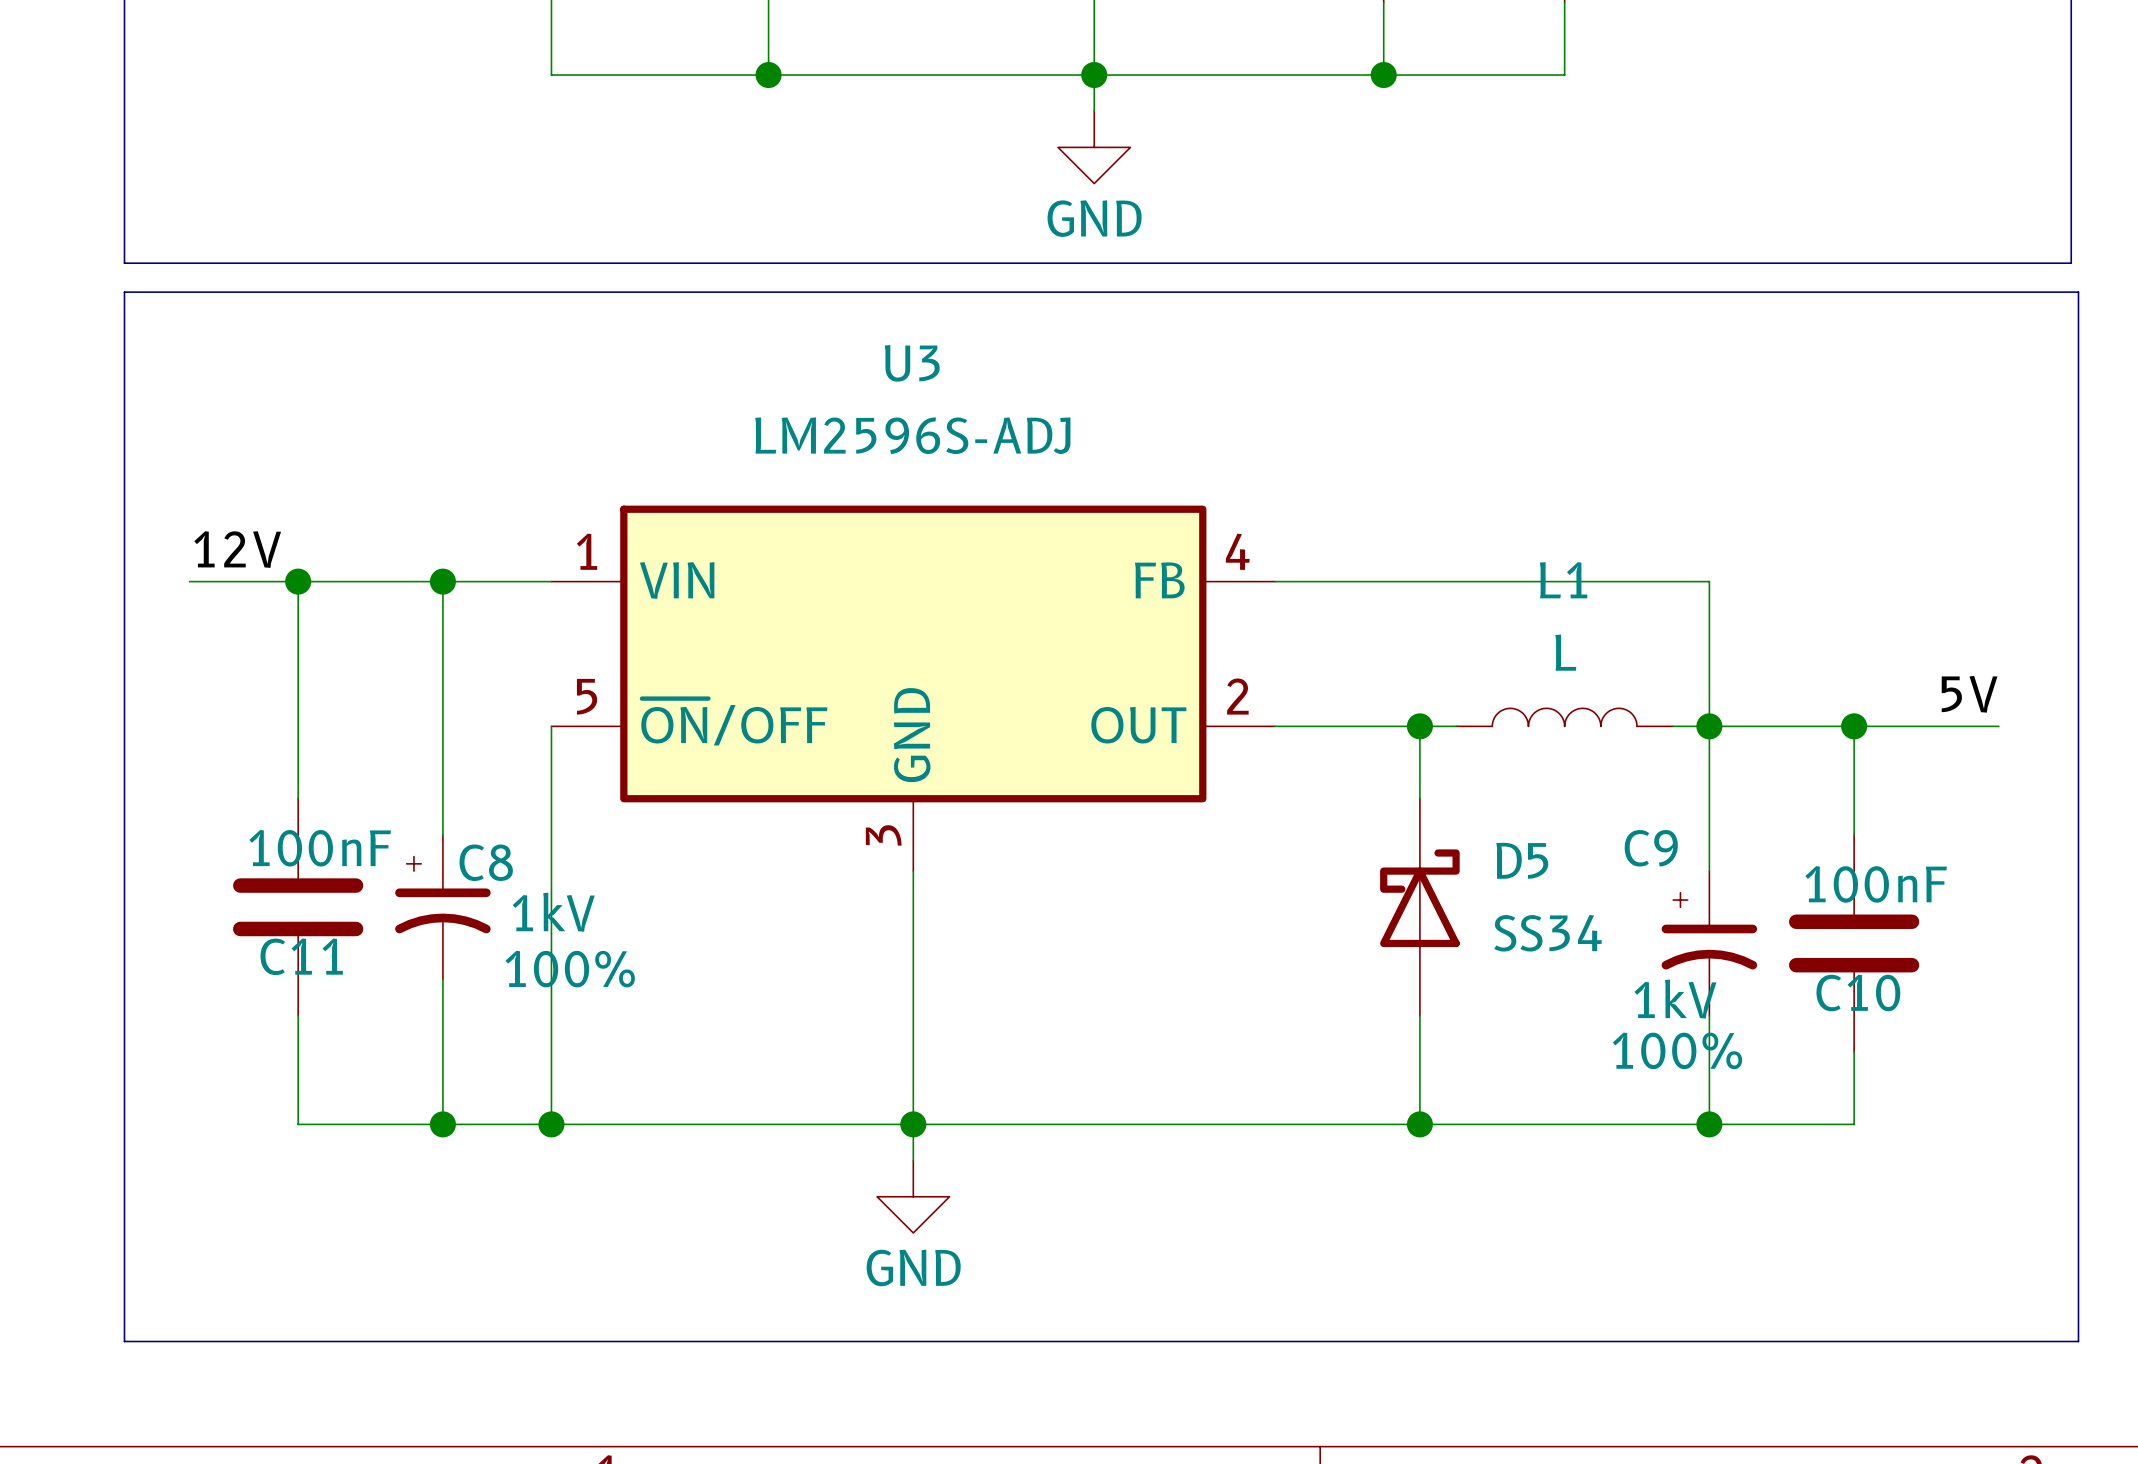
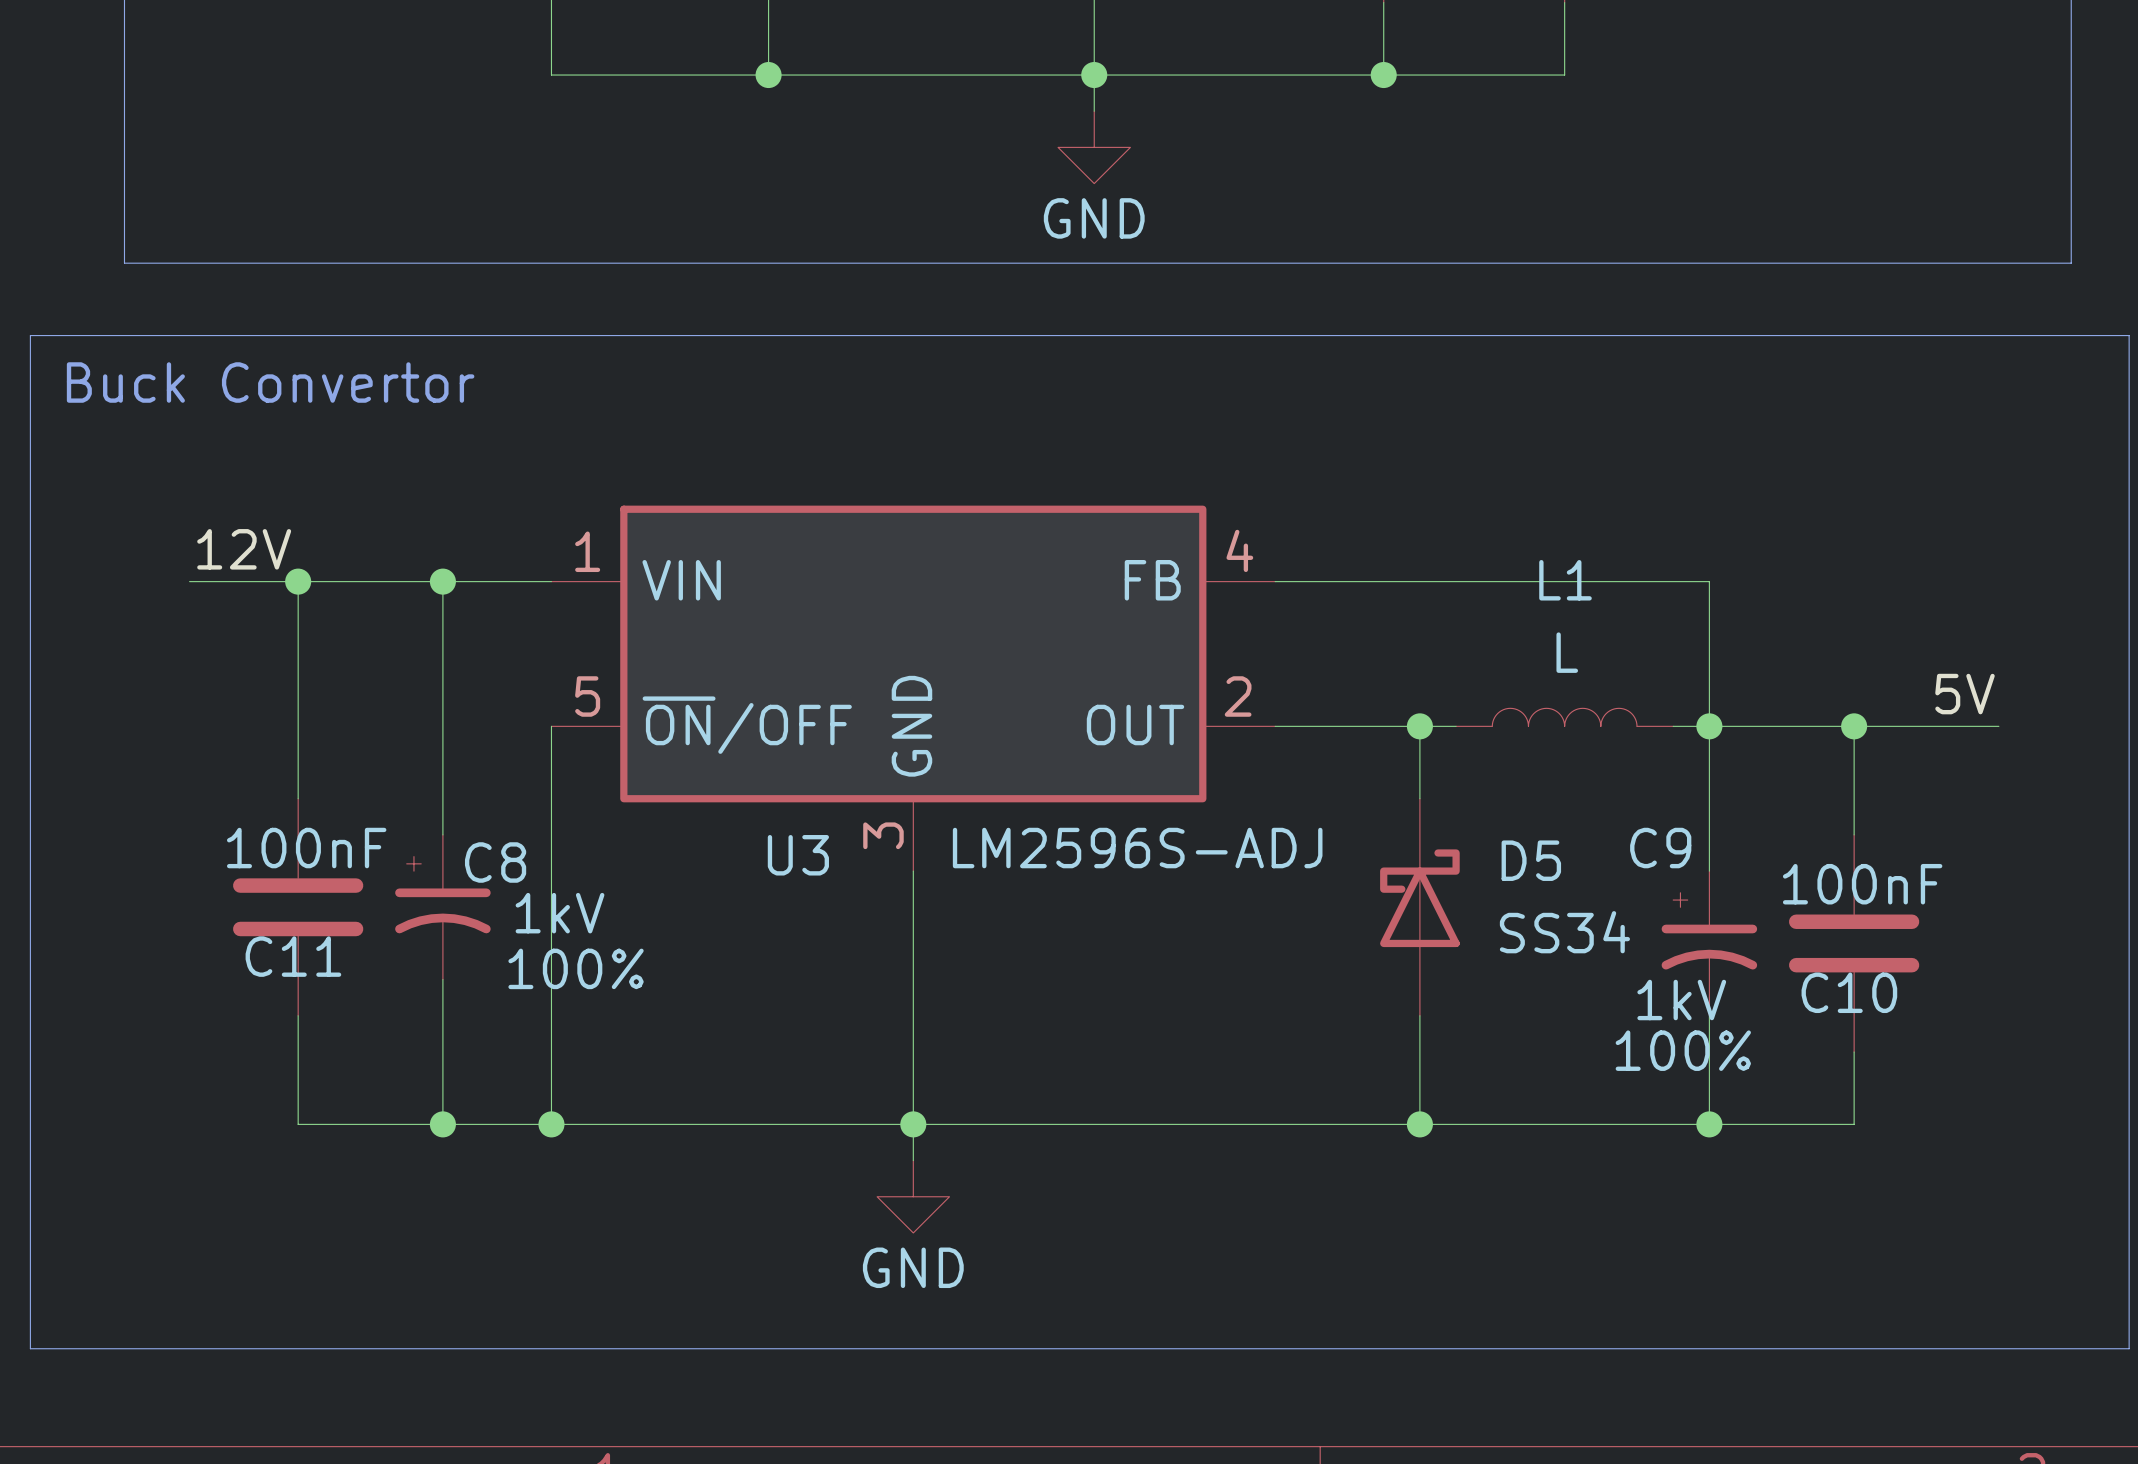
line: (124, 292) (124, 1341) (2078, 1341) (2078, 292) (124, 292) -> (30, 335) (30, 1348) (2129, 1348) (2129, 335) (30, 335)
U3 name position: U3 (912, 363) -> U3 (798, 855)
text: none -> Buck Convertor (270, 382)
U3 value position: LM2596S-ADJ (912, 435) -> LM2596S-ADJ (1137, 848)

